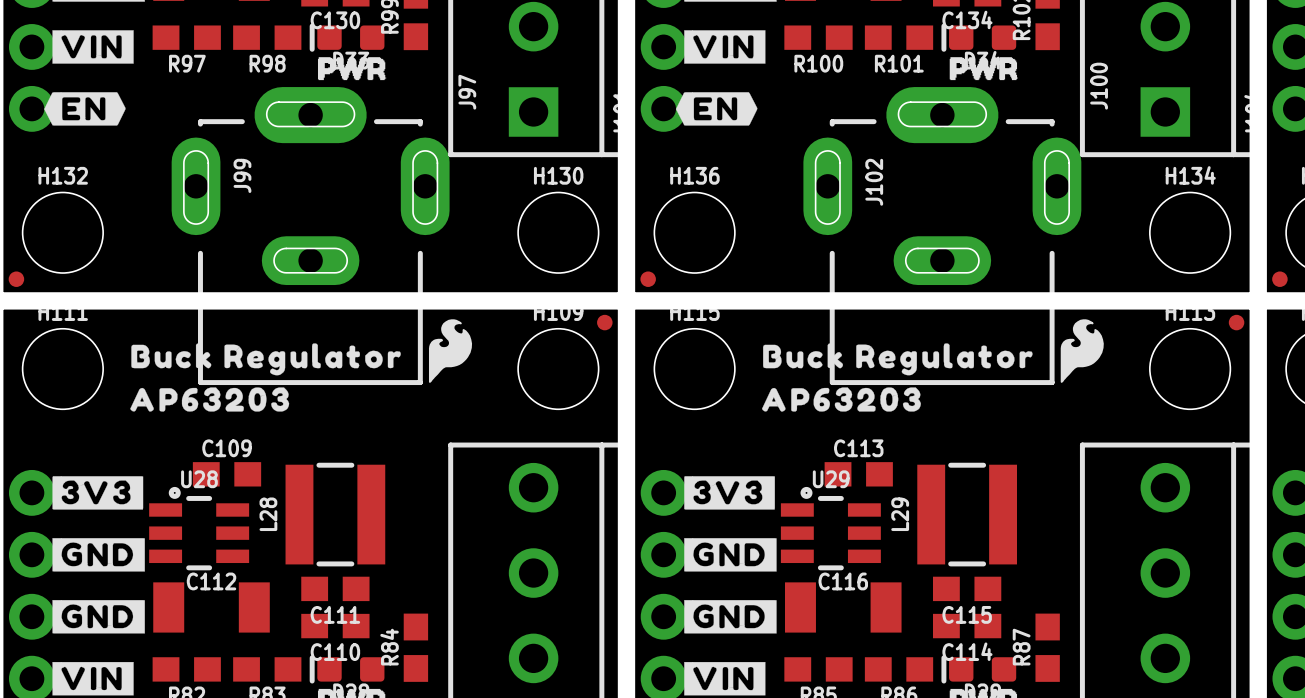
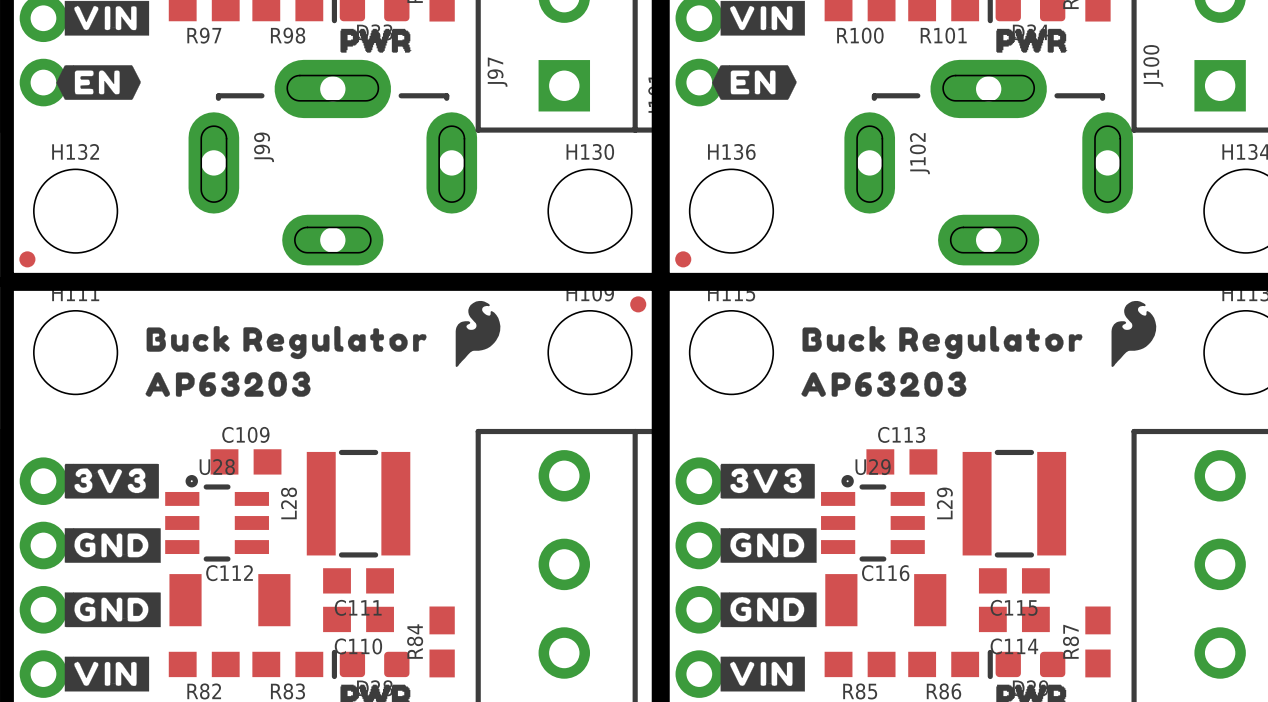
J99 footprint: [171, 87, 450, 386] -> [188, 59, 478, 266]
J102 footprint: [803, 87, 1082, 386] -> [844, 59, 1133, 266]

